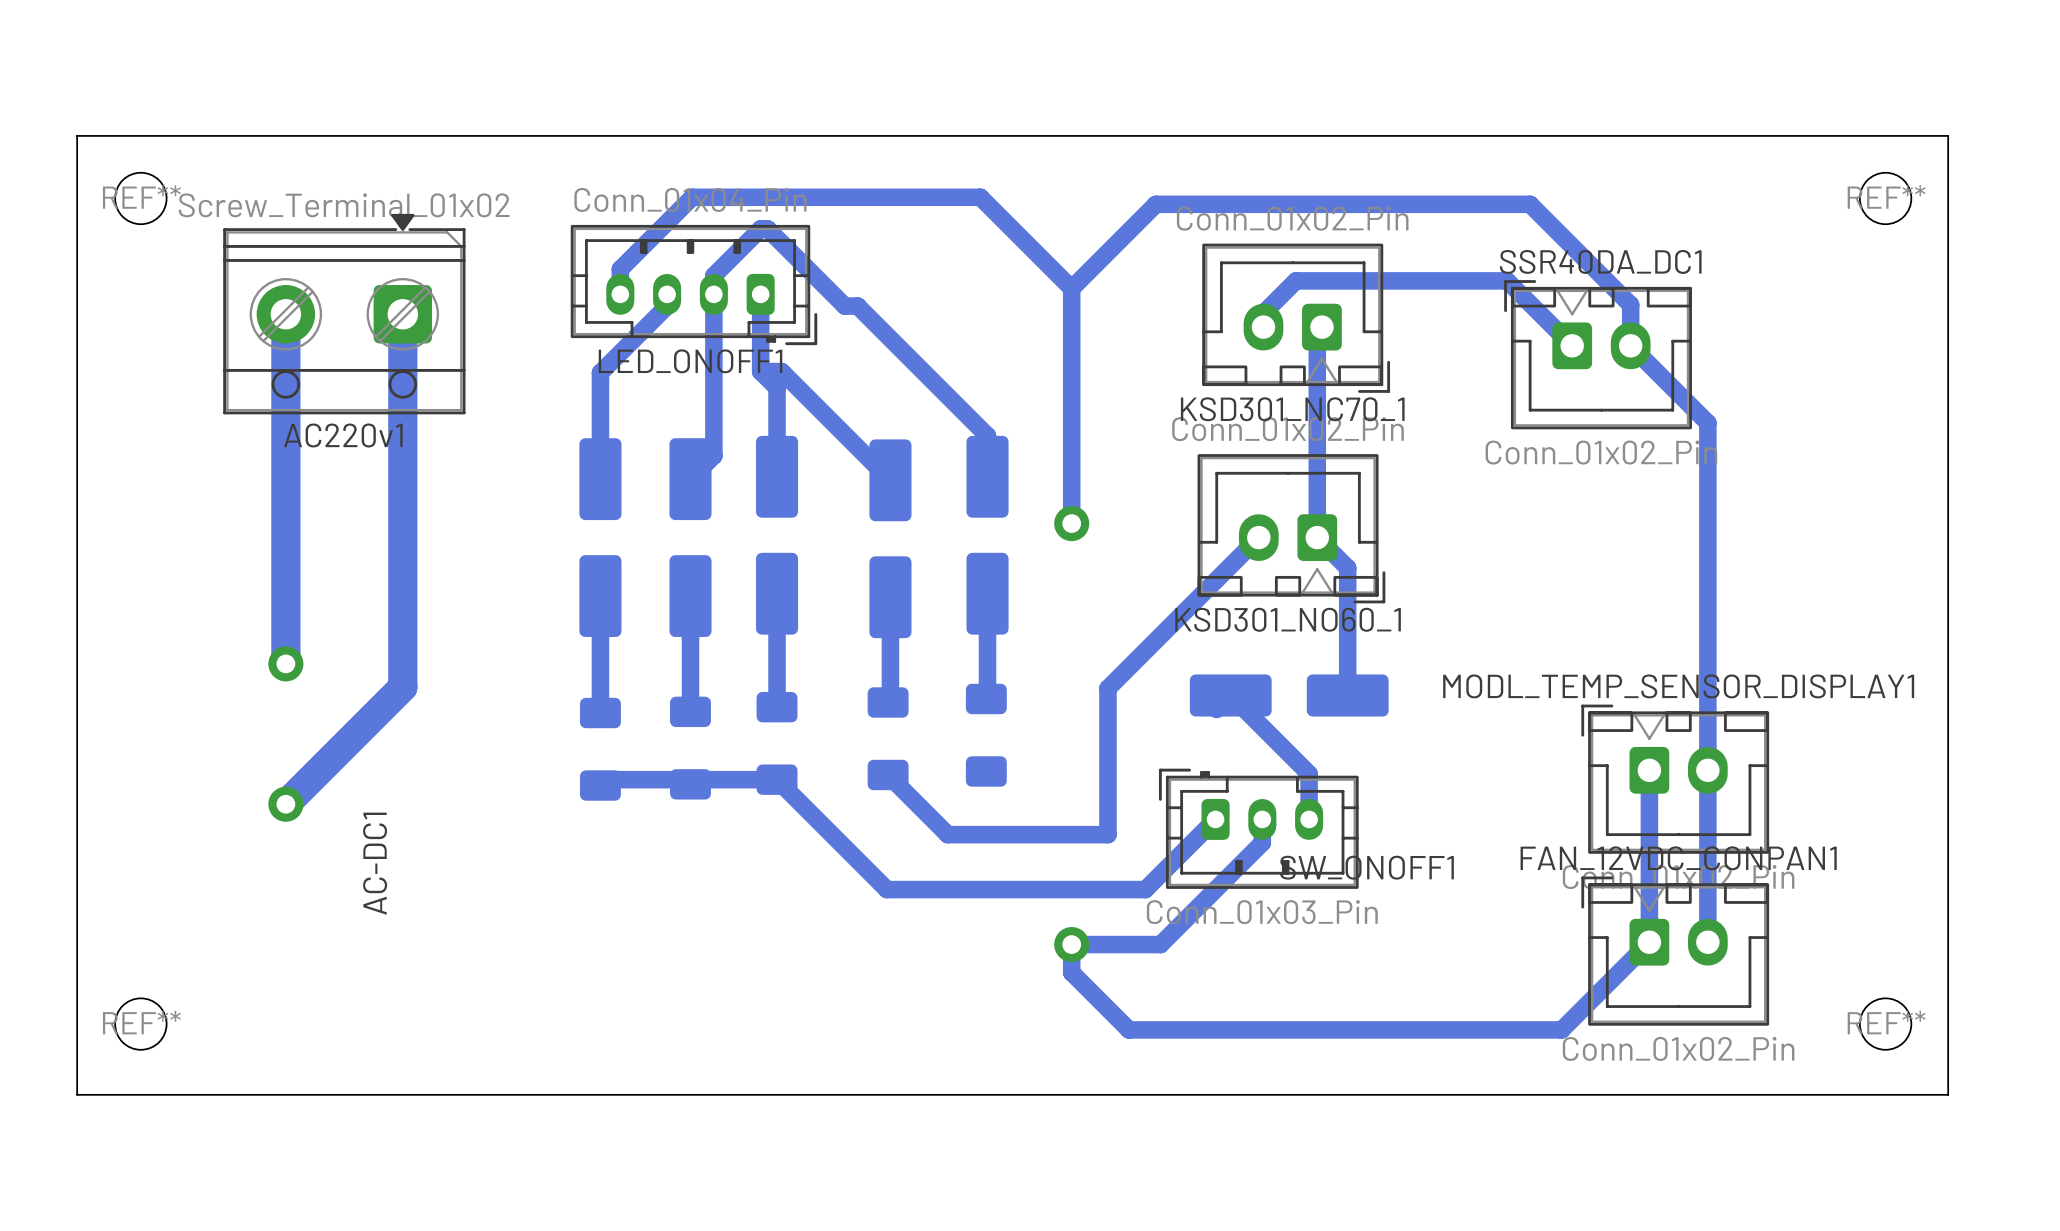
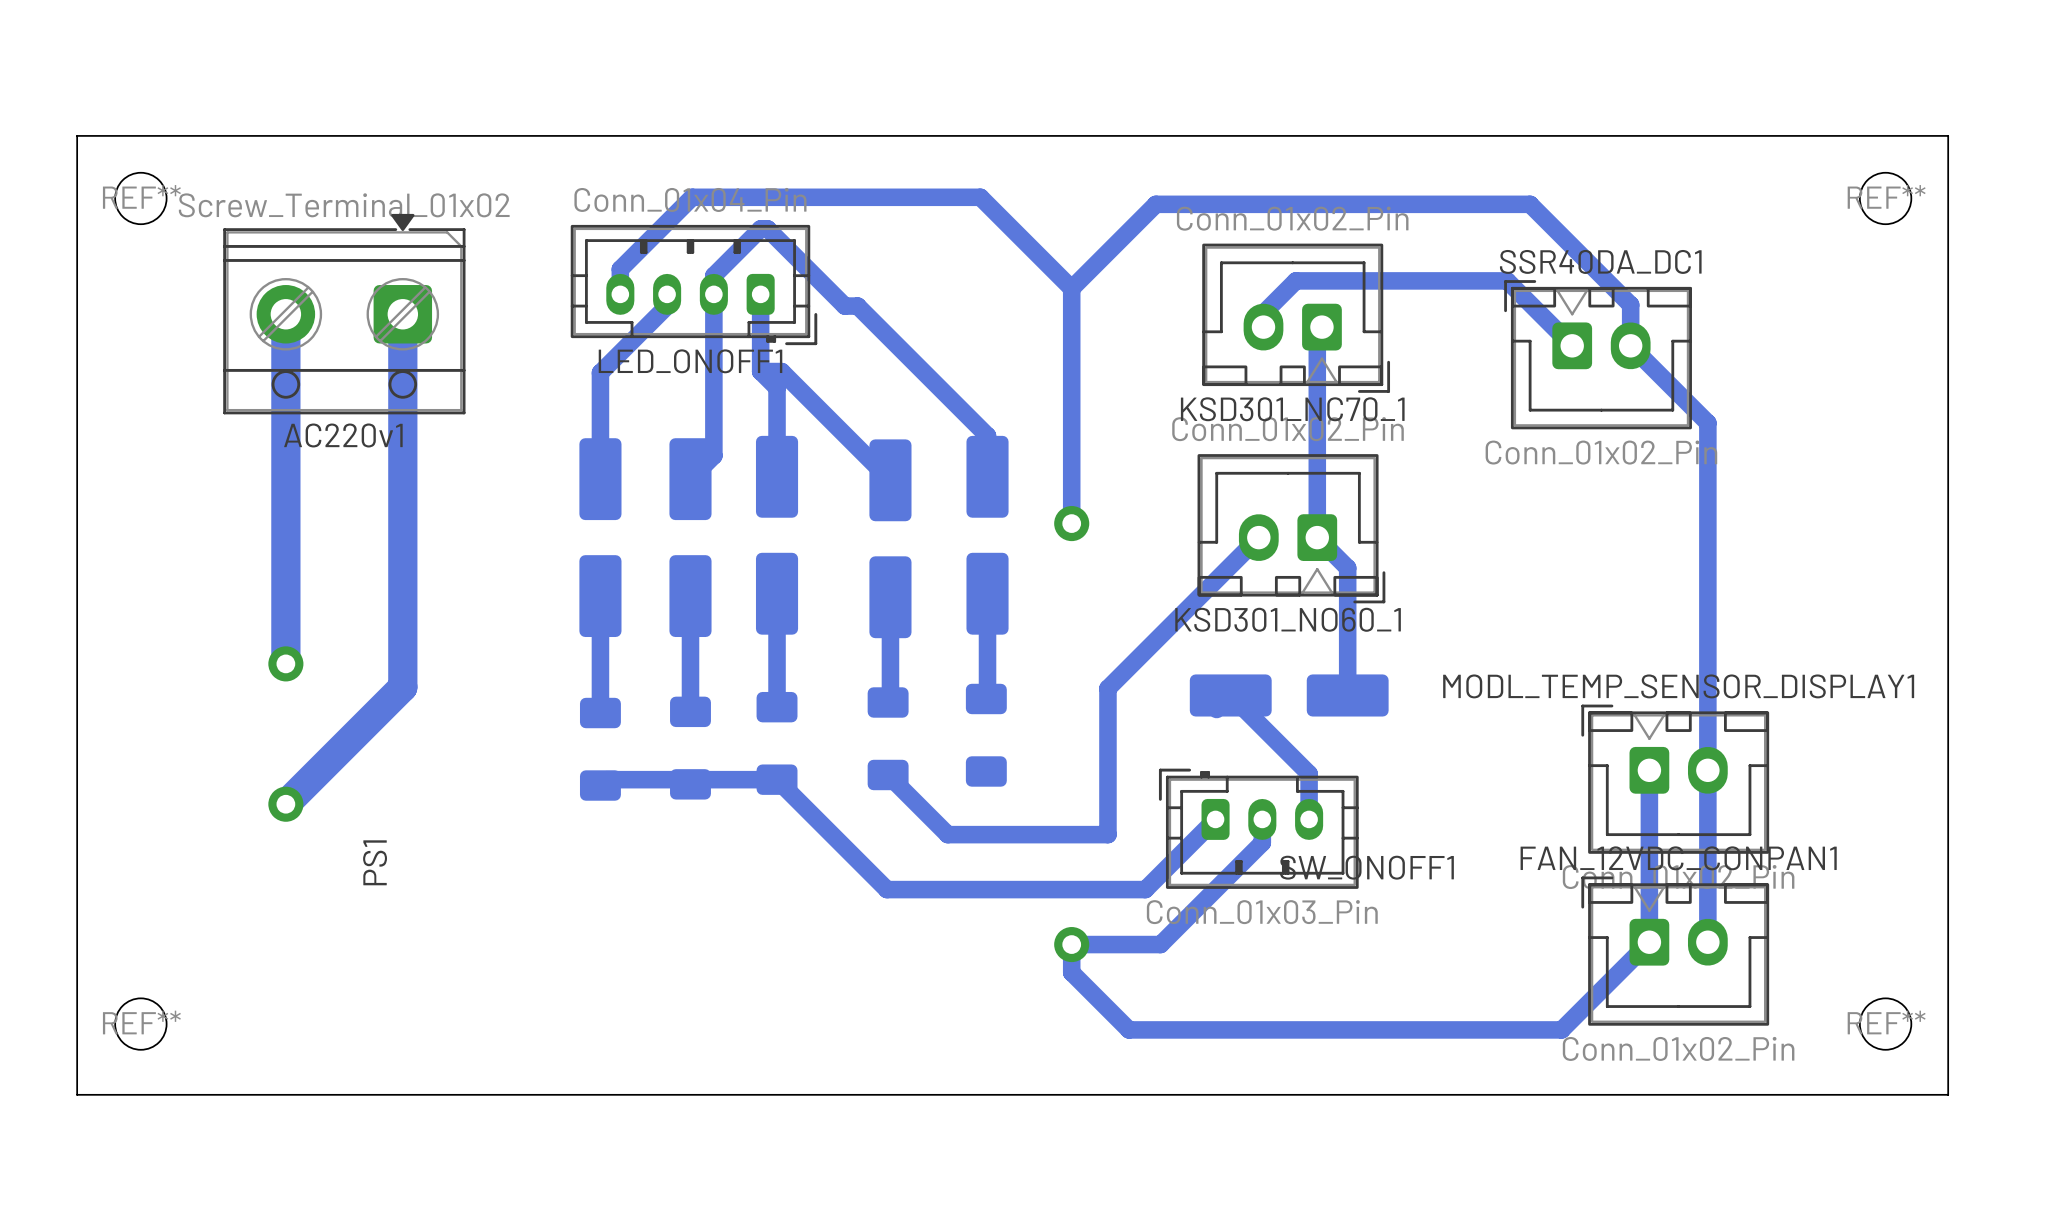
AC-DC1 name: AC-DC1 (375, 863) -> PS1 (375, 862)

